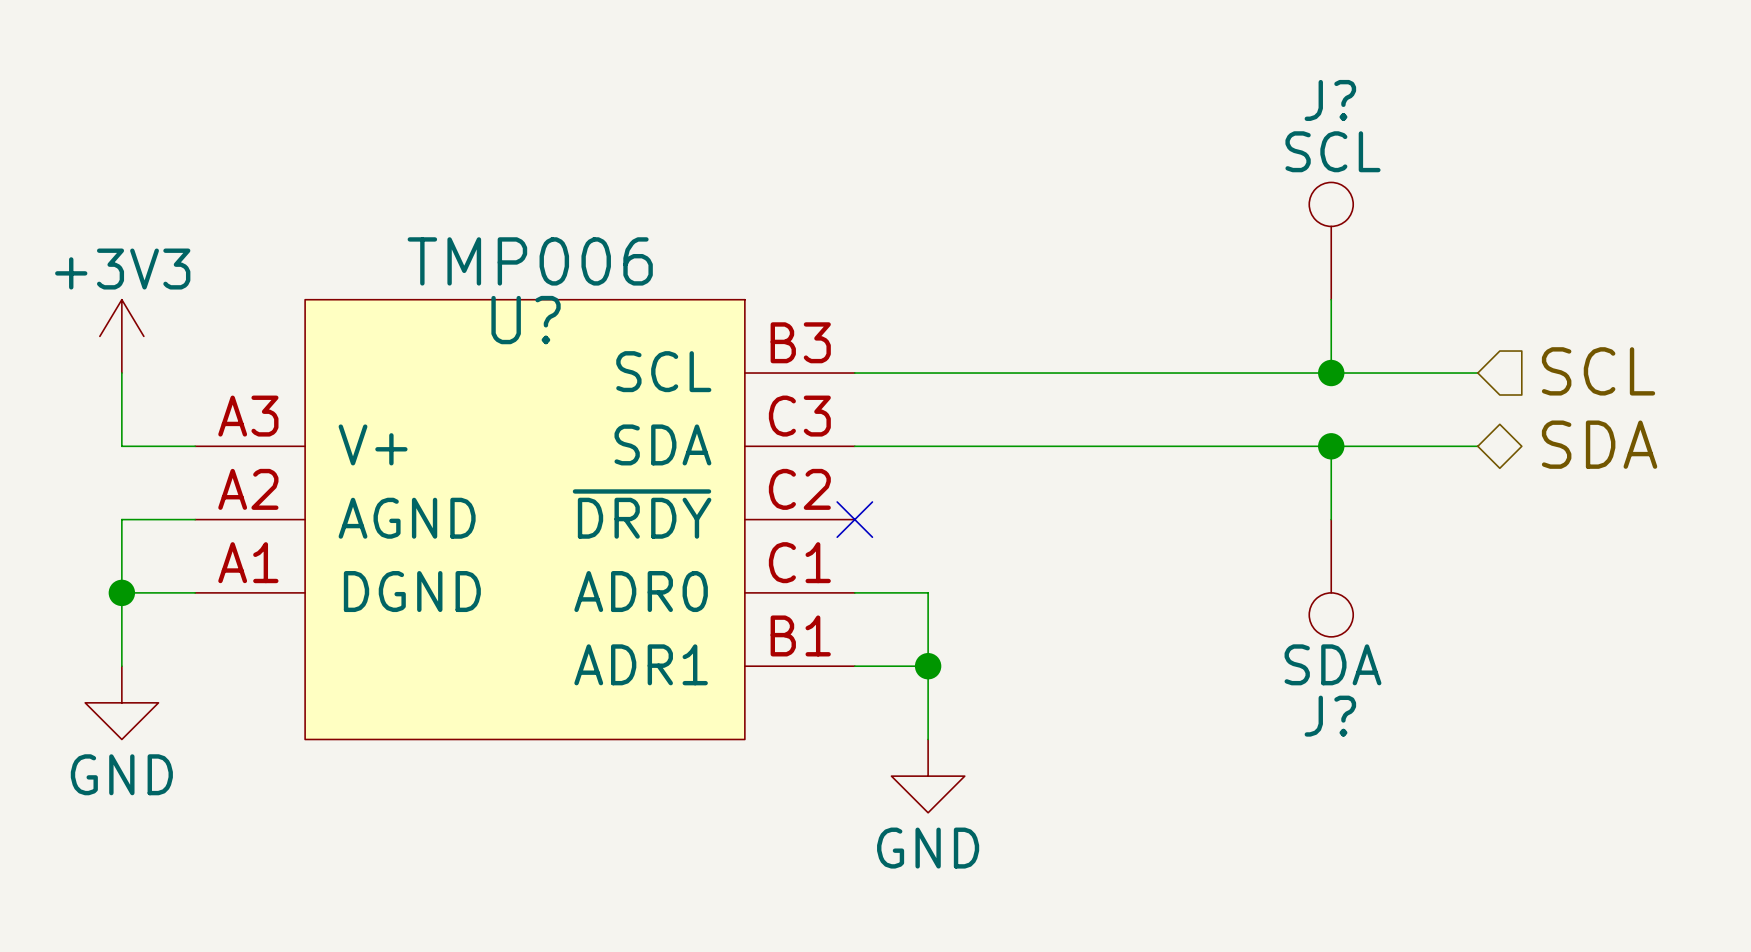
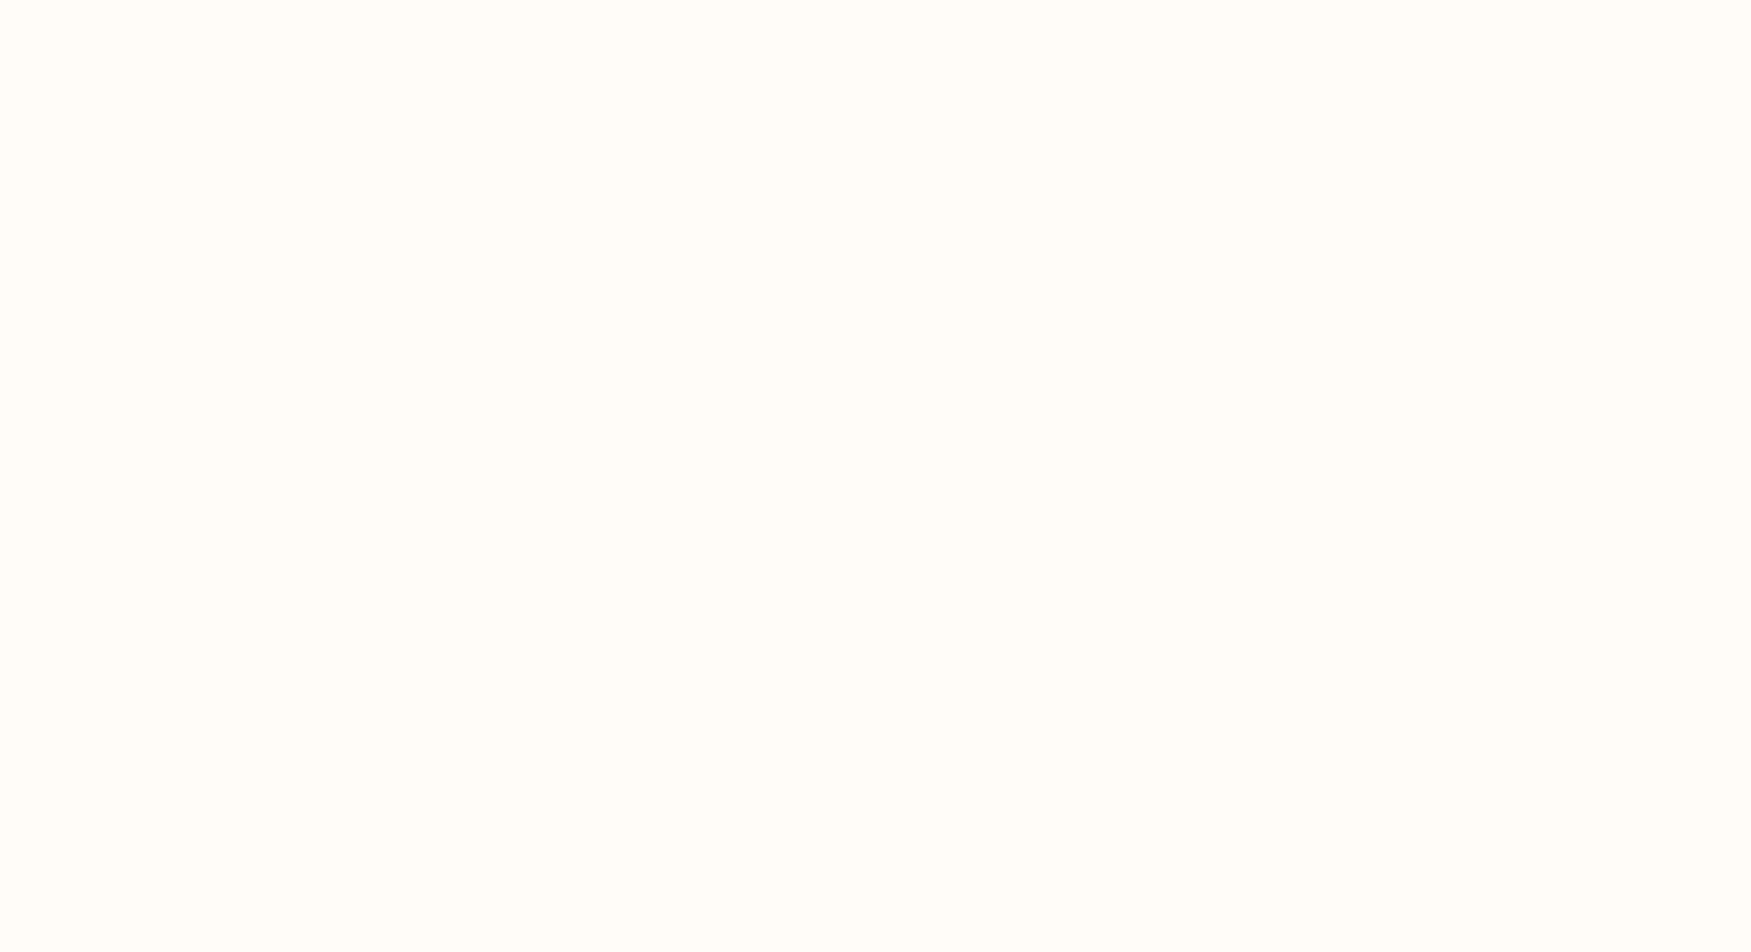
J?: SCL (1331, 241) -> none
wire: (1331, 299) (1331, 373) -> none
power symbol: +3V3 (121, 336) -> none
hierarchical label: SCL (1598, 371) -> none
wire: (121, 373) (121, 446) (195, 446) -> none
wire: (854, 373) (1477, 373) -> none
junction: (1331, 373) -> none
hierarchical label: SDA (1599, 444) -> none
wire: (854, 446) (1477, 446) -> none
wire: (1331, 446) (1331, 519) -> none
junction: (1331, 446) -> none
wire: (195, 519) (121, 519) (121, 666) -> none
U?: TMP006 (524, 519) -> none
no-connect mark: (854, 519) -> none
J?: SDA (1331, 578) -> none
wire: (121, 592) (195, 592) -> none
junction: (121, 592) -> none
wire: (854, 592) (928, 592) (928, 739) -> none
wire: (854, 666) (928, 666) -> none
junction: (928, 666) -> none
power symbol: GND (121, 702) -> none
power symbol: GND (928, 776) -> none

